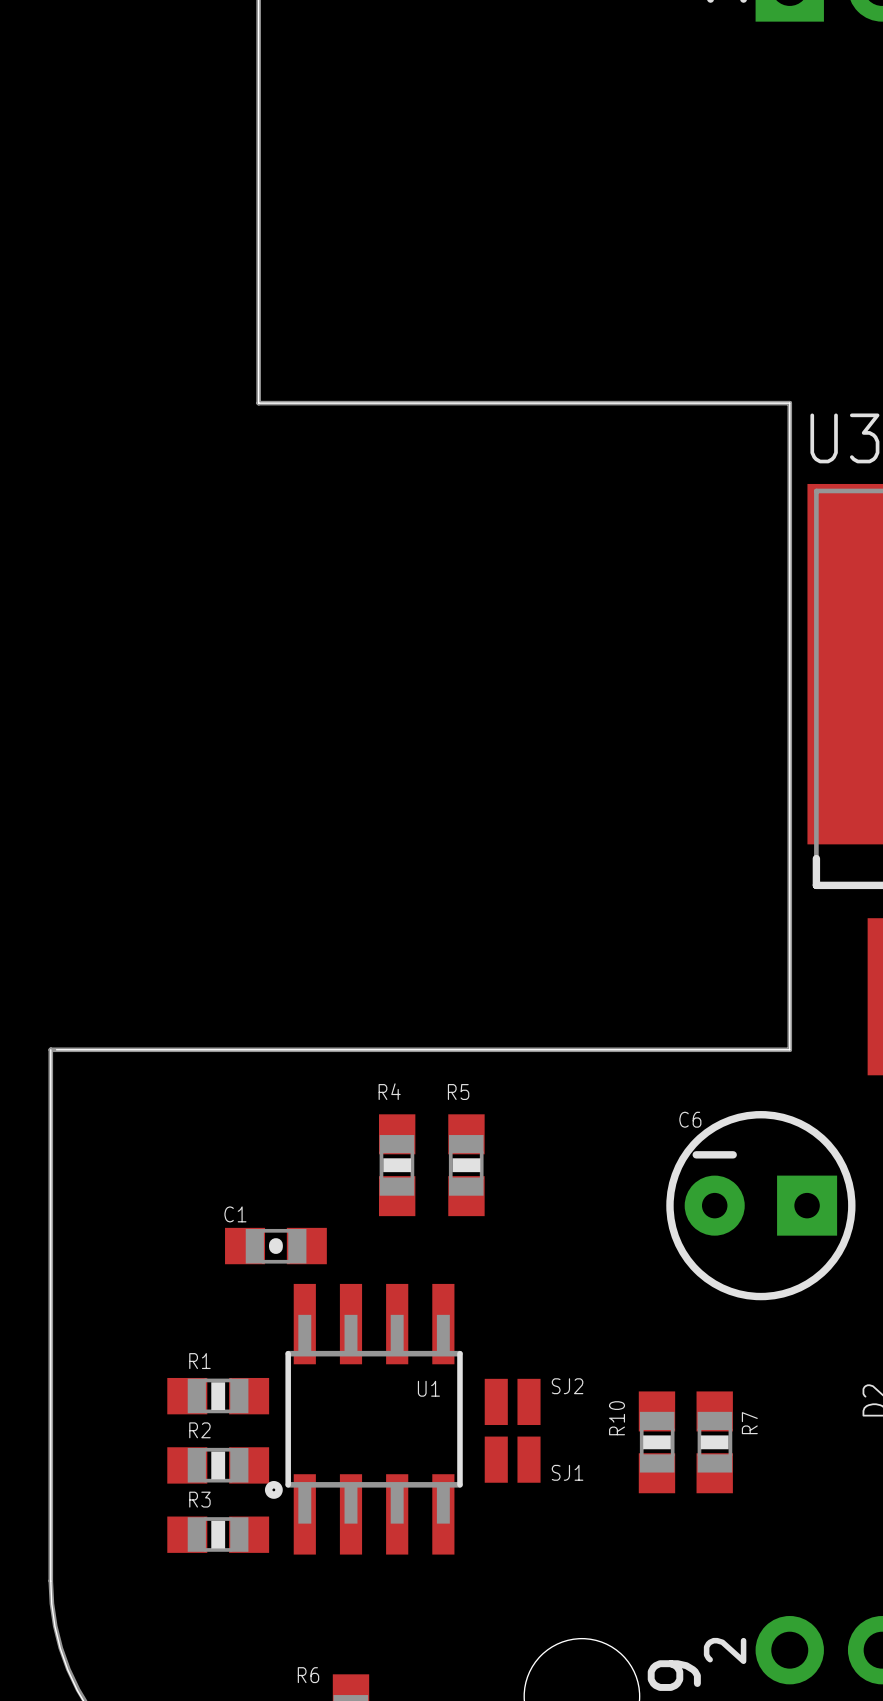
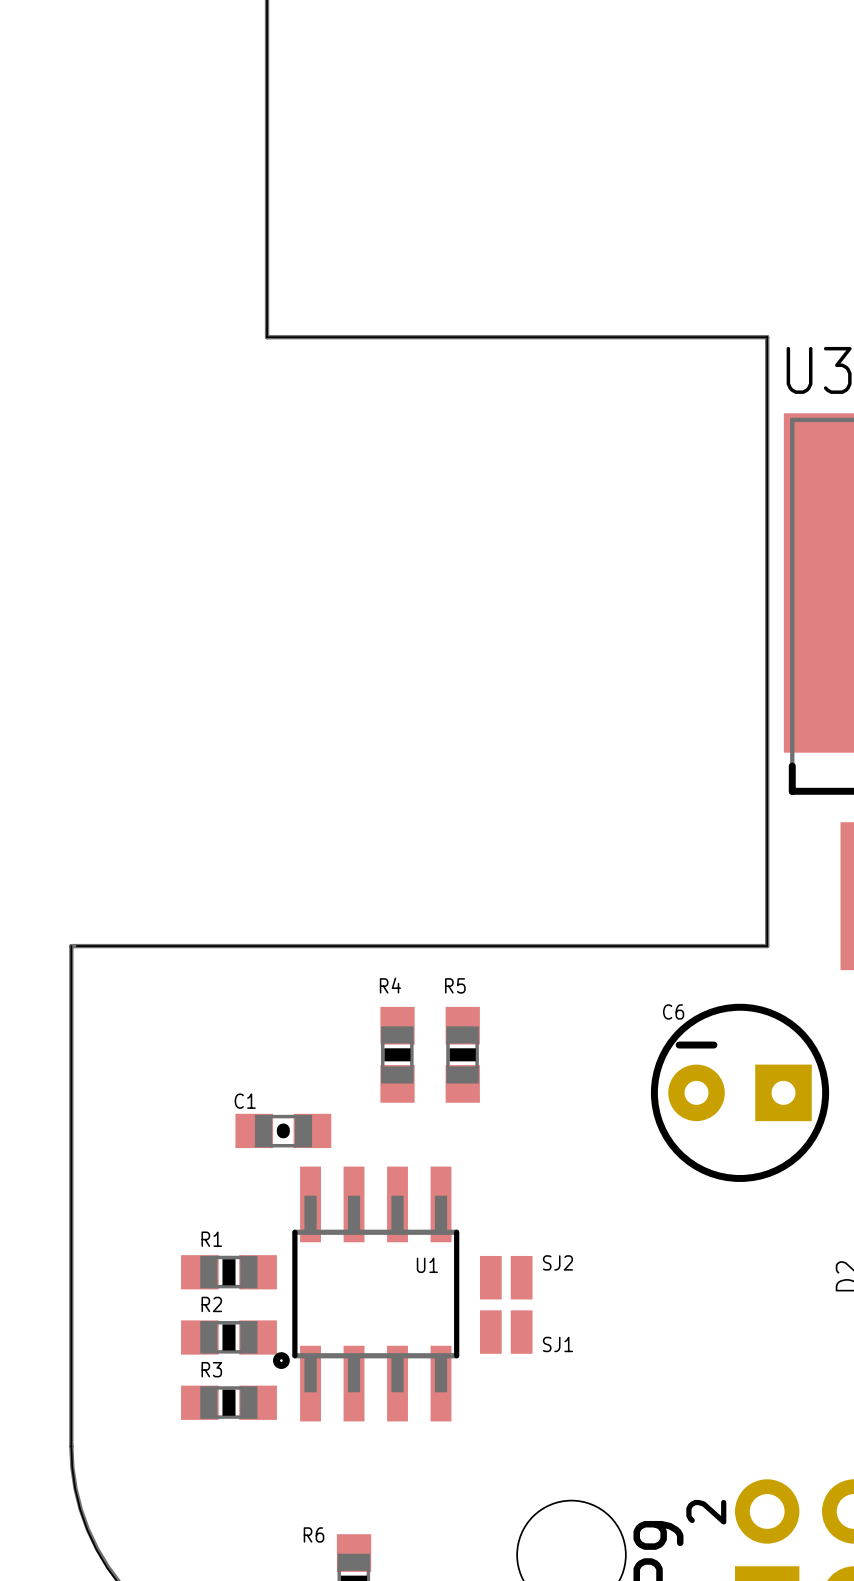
R10: (656, 1442) -> none
R7: (714, 1442) -> none

